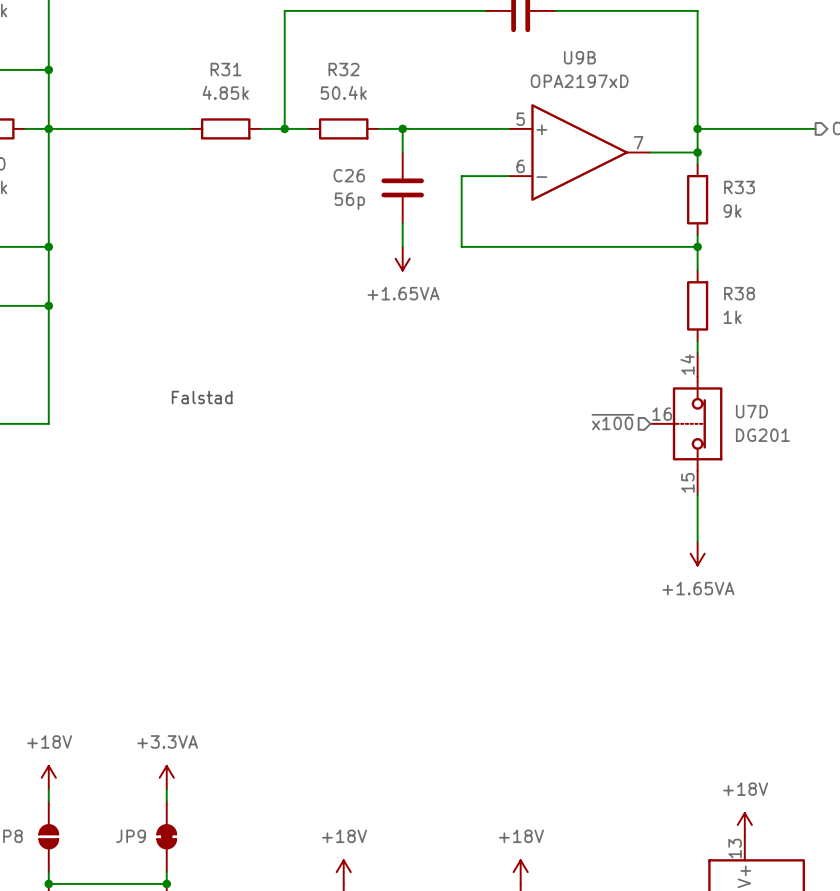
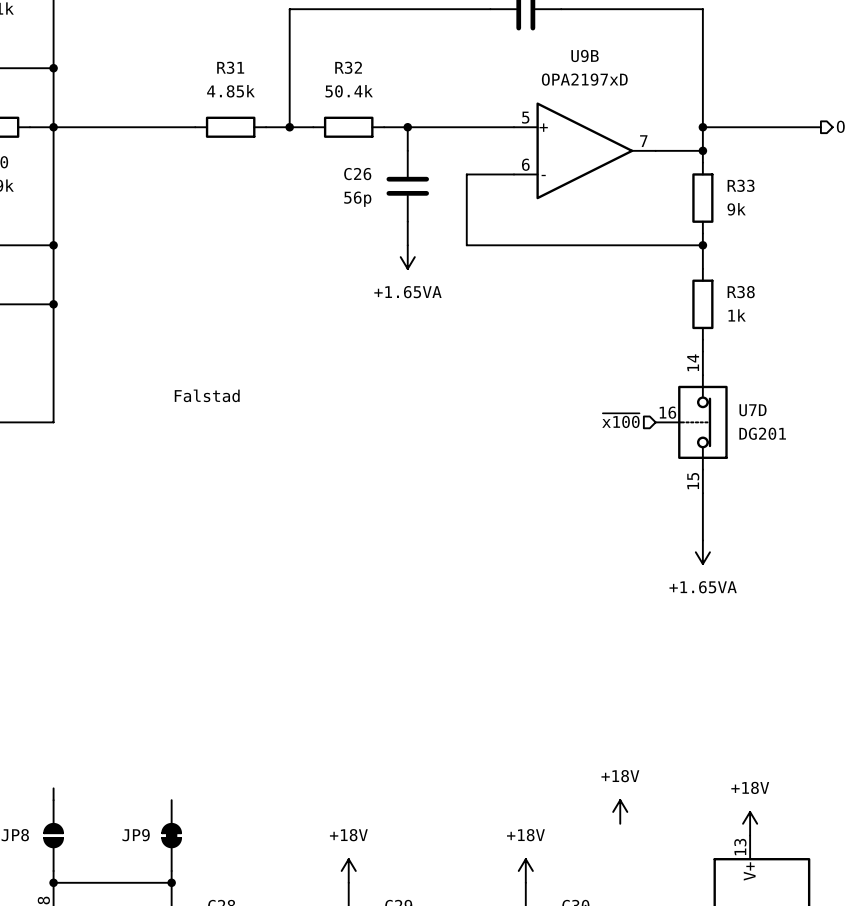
power symbol: +18V (48, 777) -> none
power symbol: +3.3VA (166, 777) -> none
wire: (166, 789) (166, 801) -> none
power symbol: none -> +18V (620, 811)

